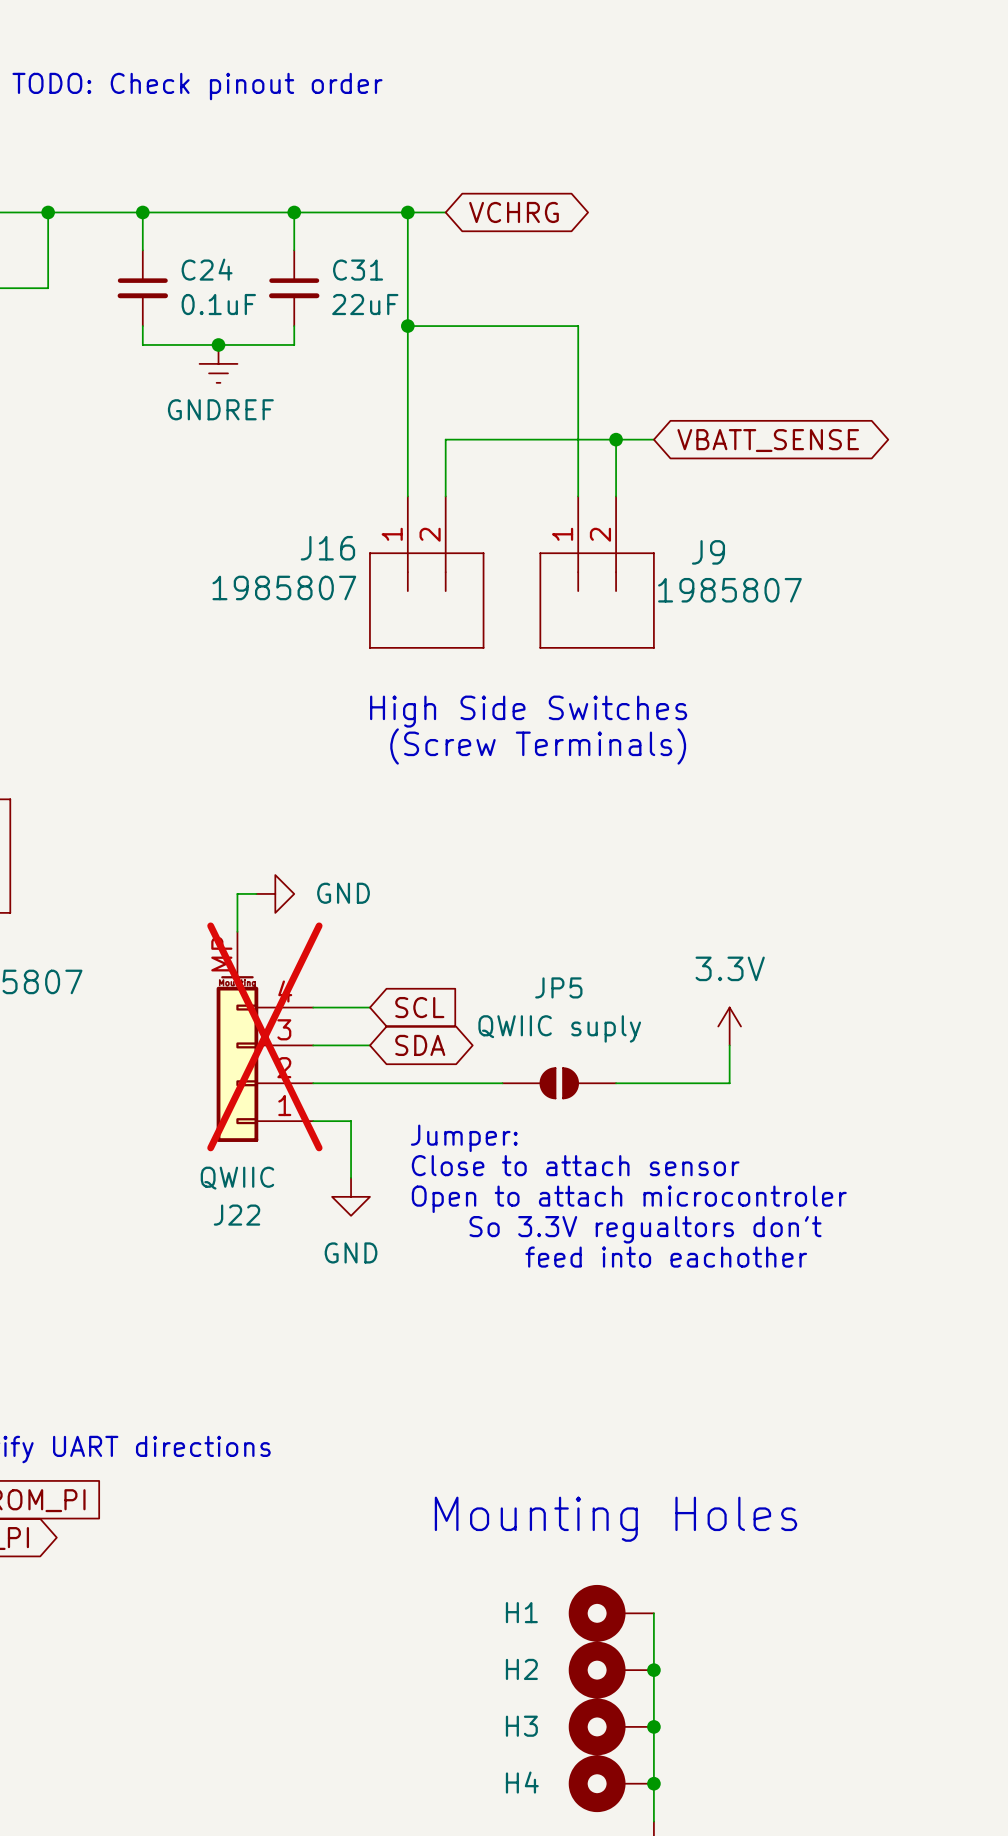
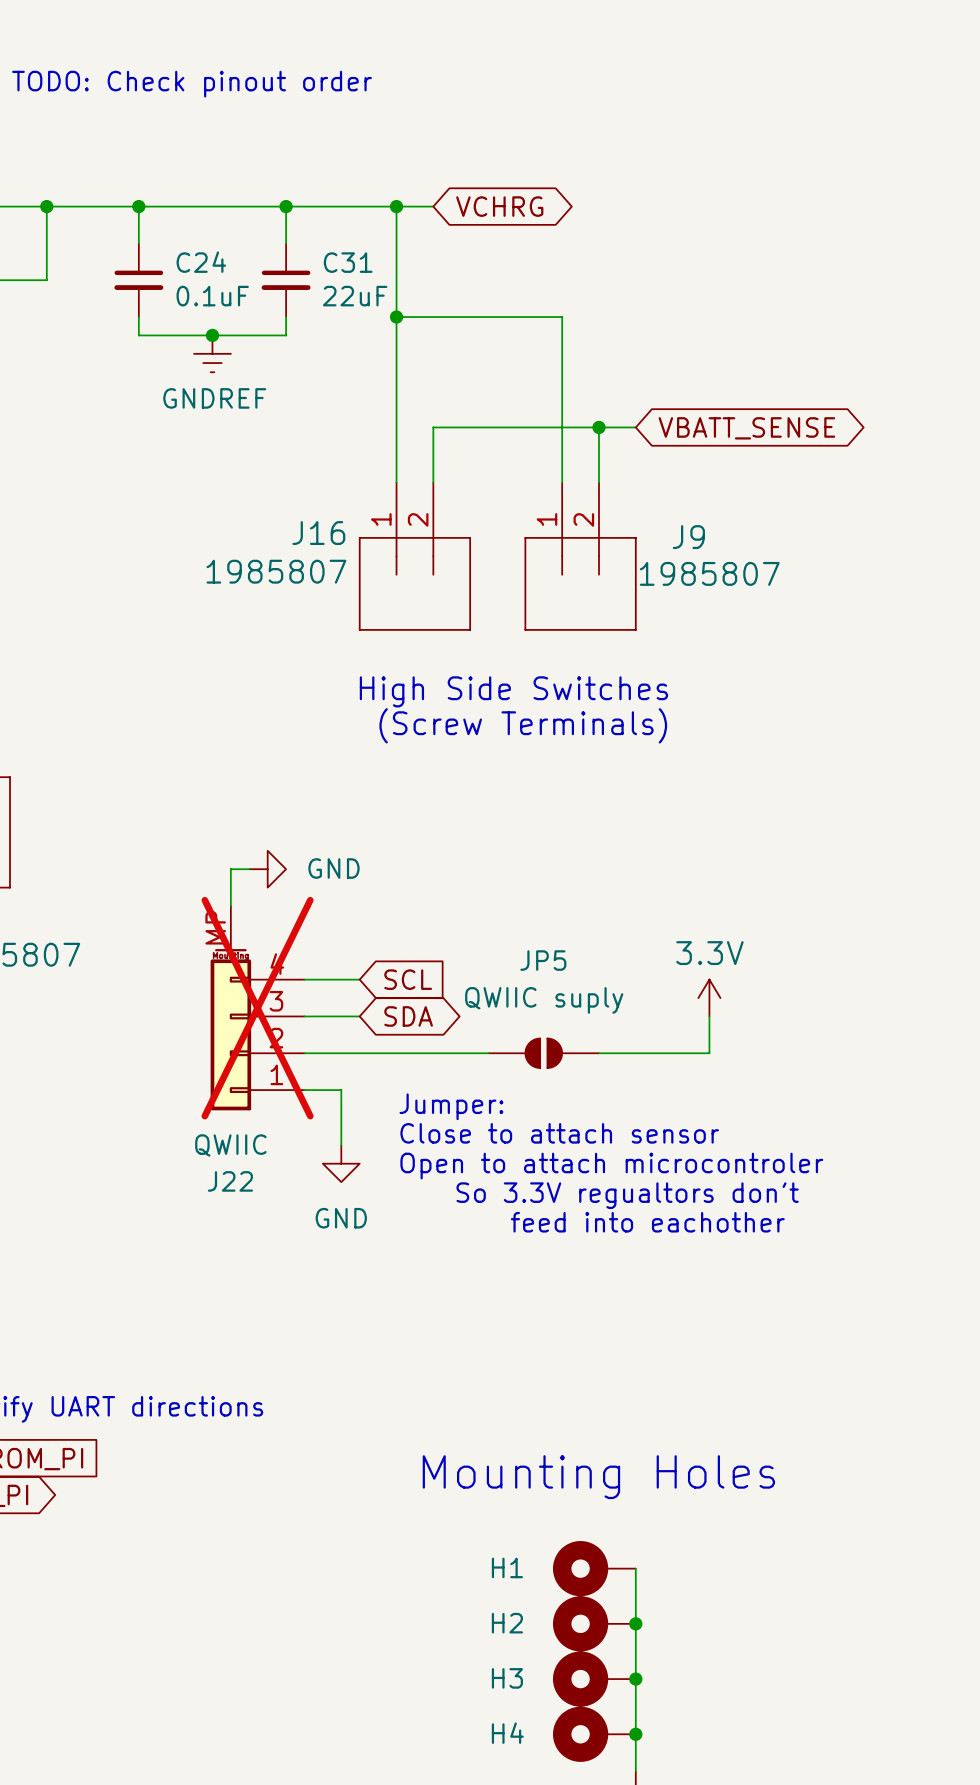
power symbol shape: [718, 1007, 742, 1046] -> [698, 979, 721, 1017]

